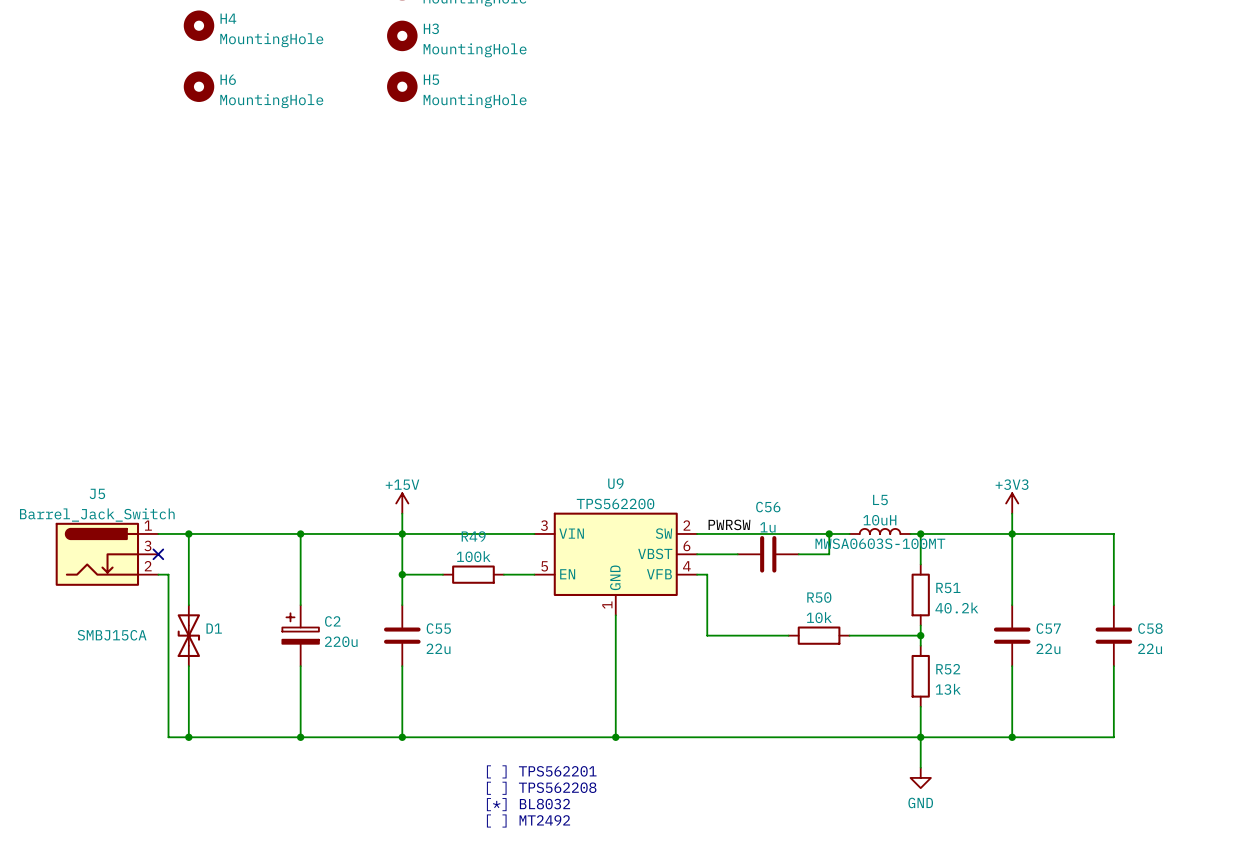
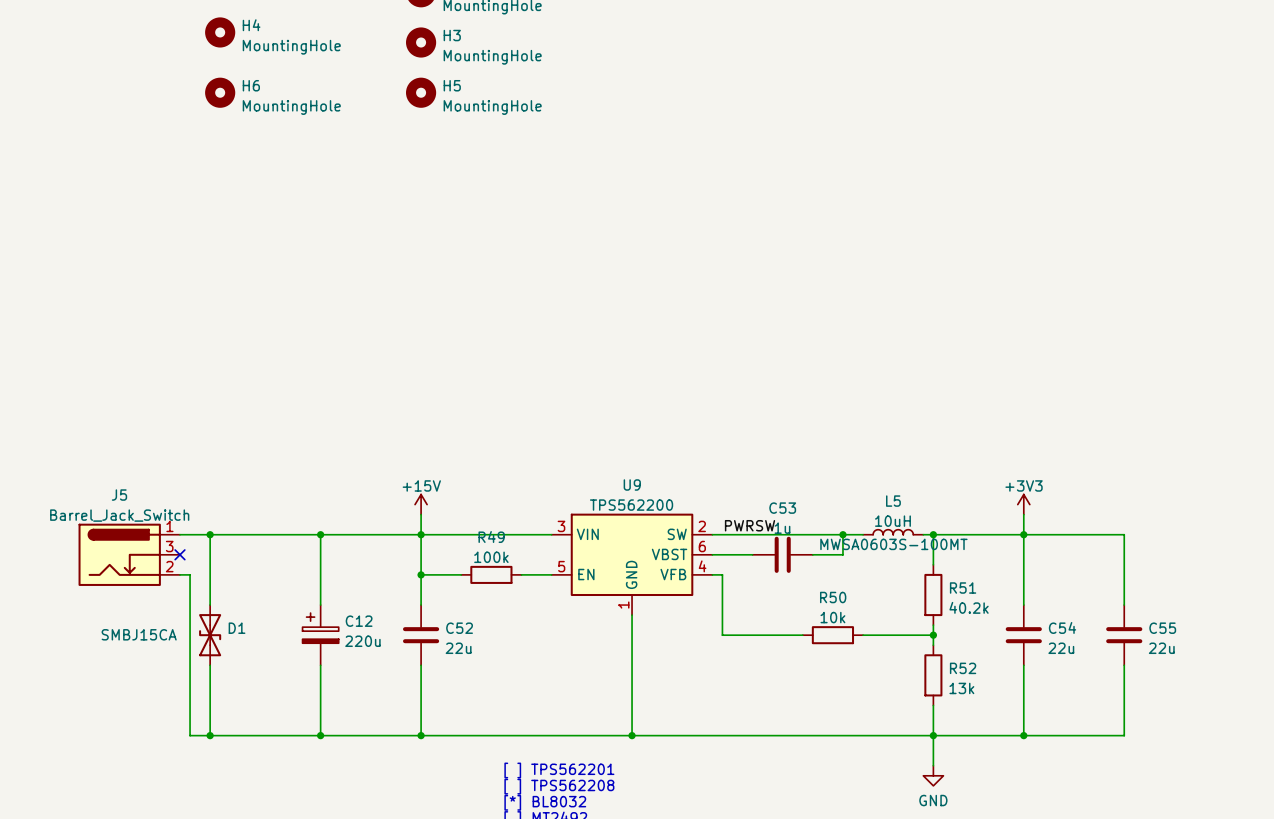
C56 name: C56 (768, 507) -> C53 (782, 508)
C2 name: C2 (332, 621) -> C12 (359, 621)
C55 name: C55 (438, 628) -> C52 (459, 628)
C57 name: C57 (1048, 628) -> C54 (1062, 627)
C58 name: C58 (1150, 628) -> C55 (1162, 628)

